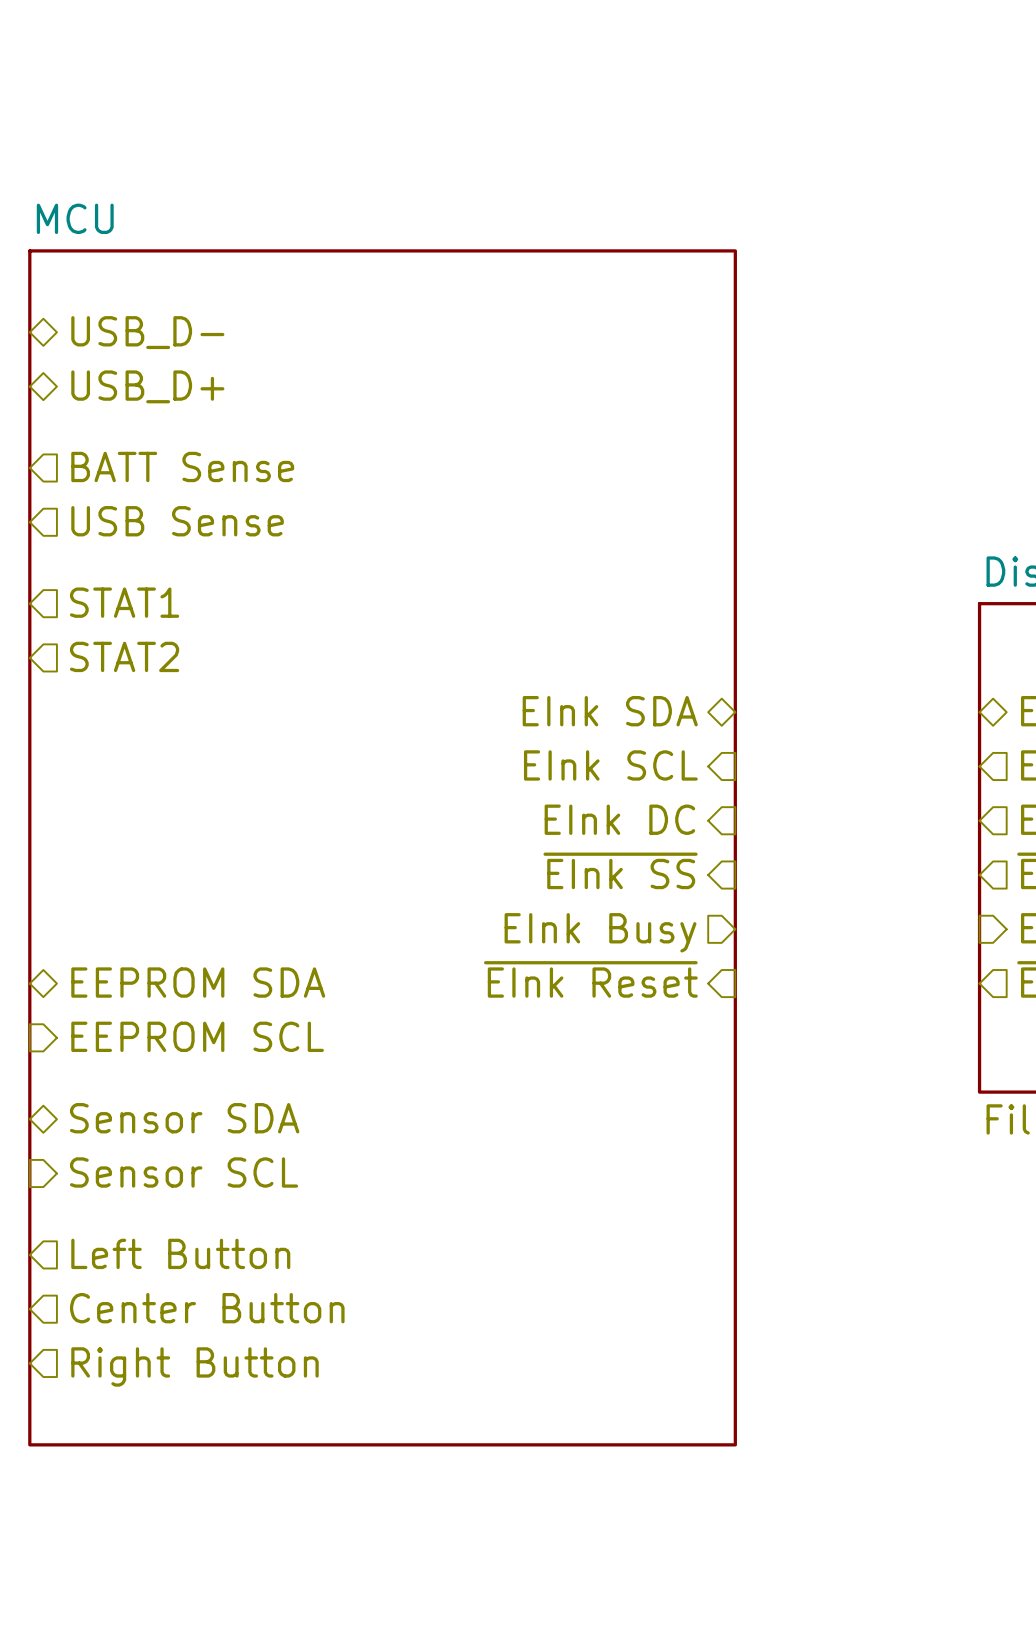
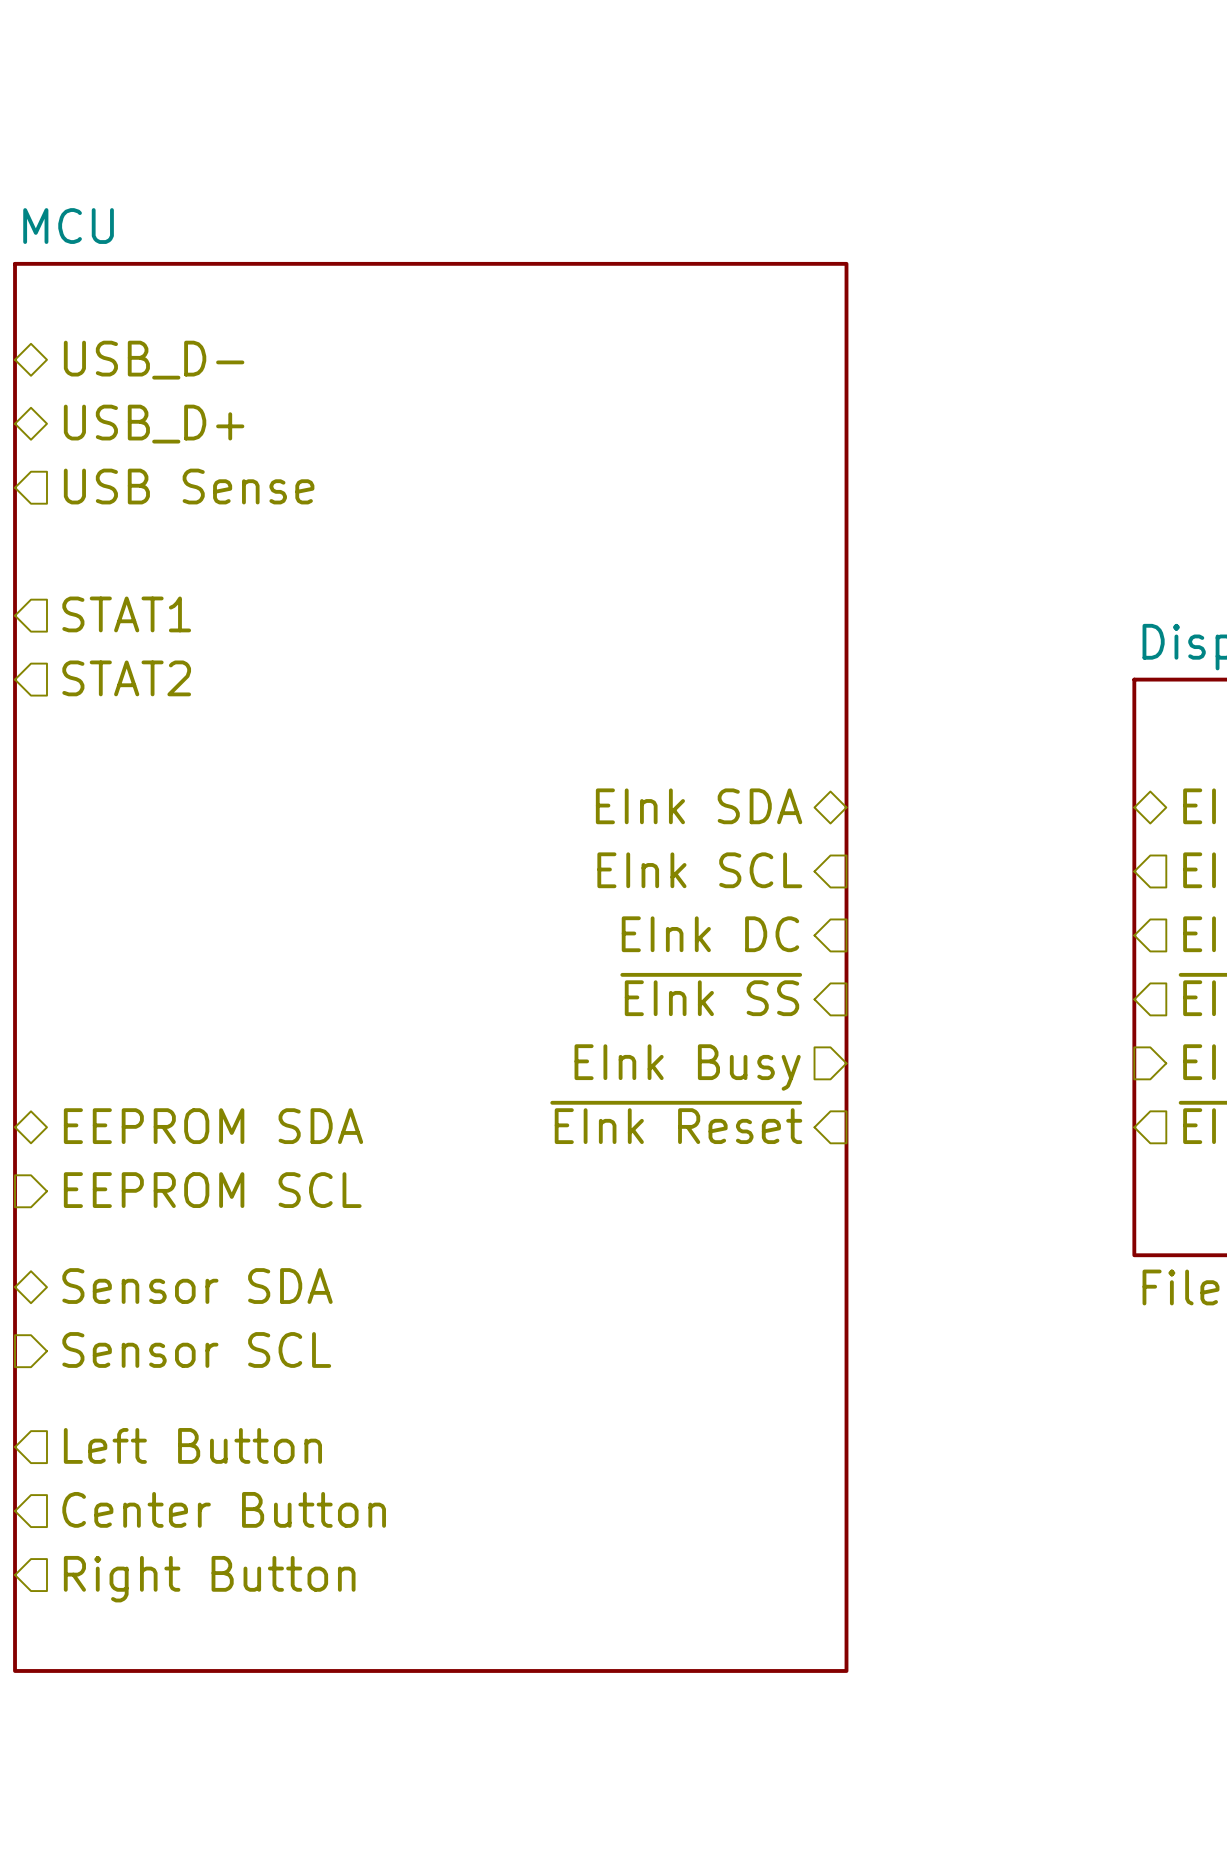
hierarchical label: BATT Sense (182, 466) -> none
hierarchical label position: USB Sense (177, 521) -> USB Sense (189, 486)
hierarchical label: none -> STAT1 (126, 614)
hierarchical label: STAT1 (124, 602) -> STAT2 (126, 678)
hierarchical label: STAT2 (124, 656) -> none

